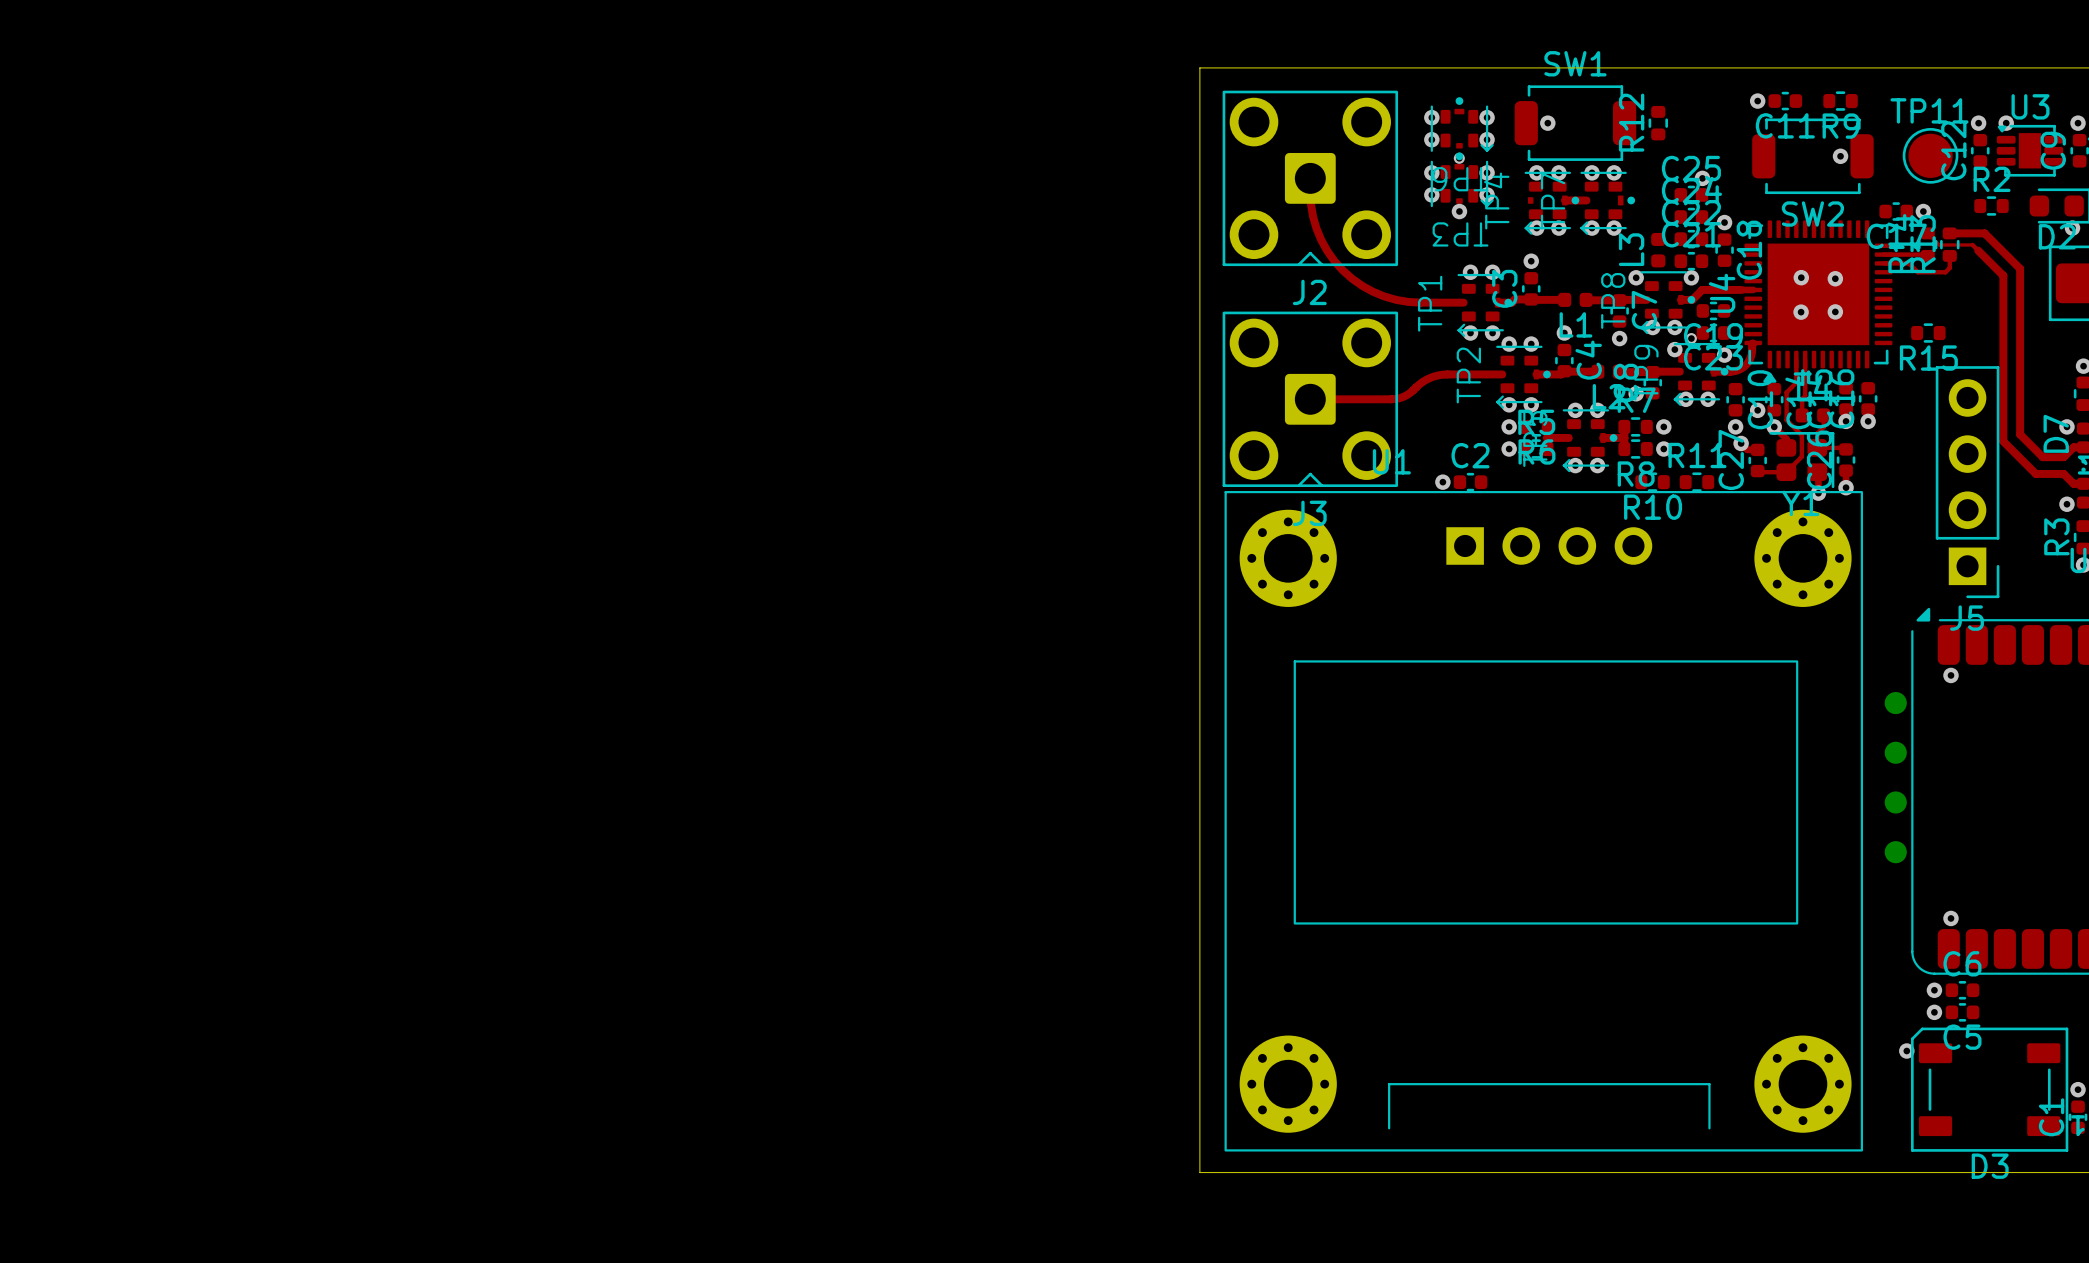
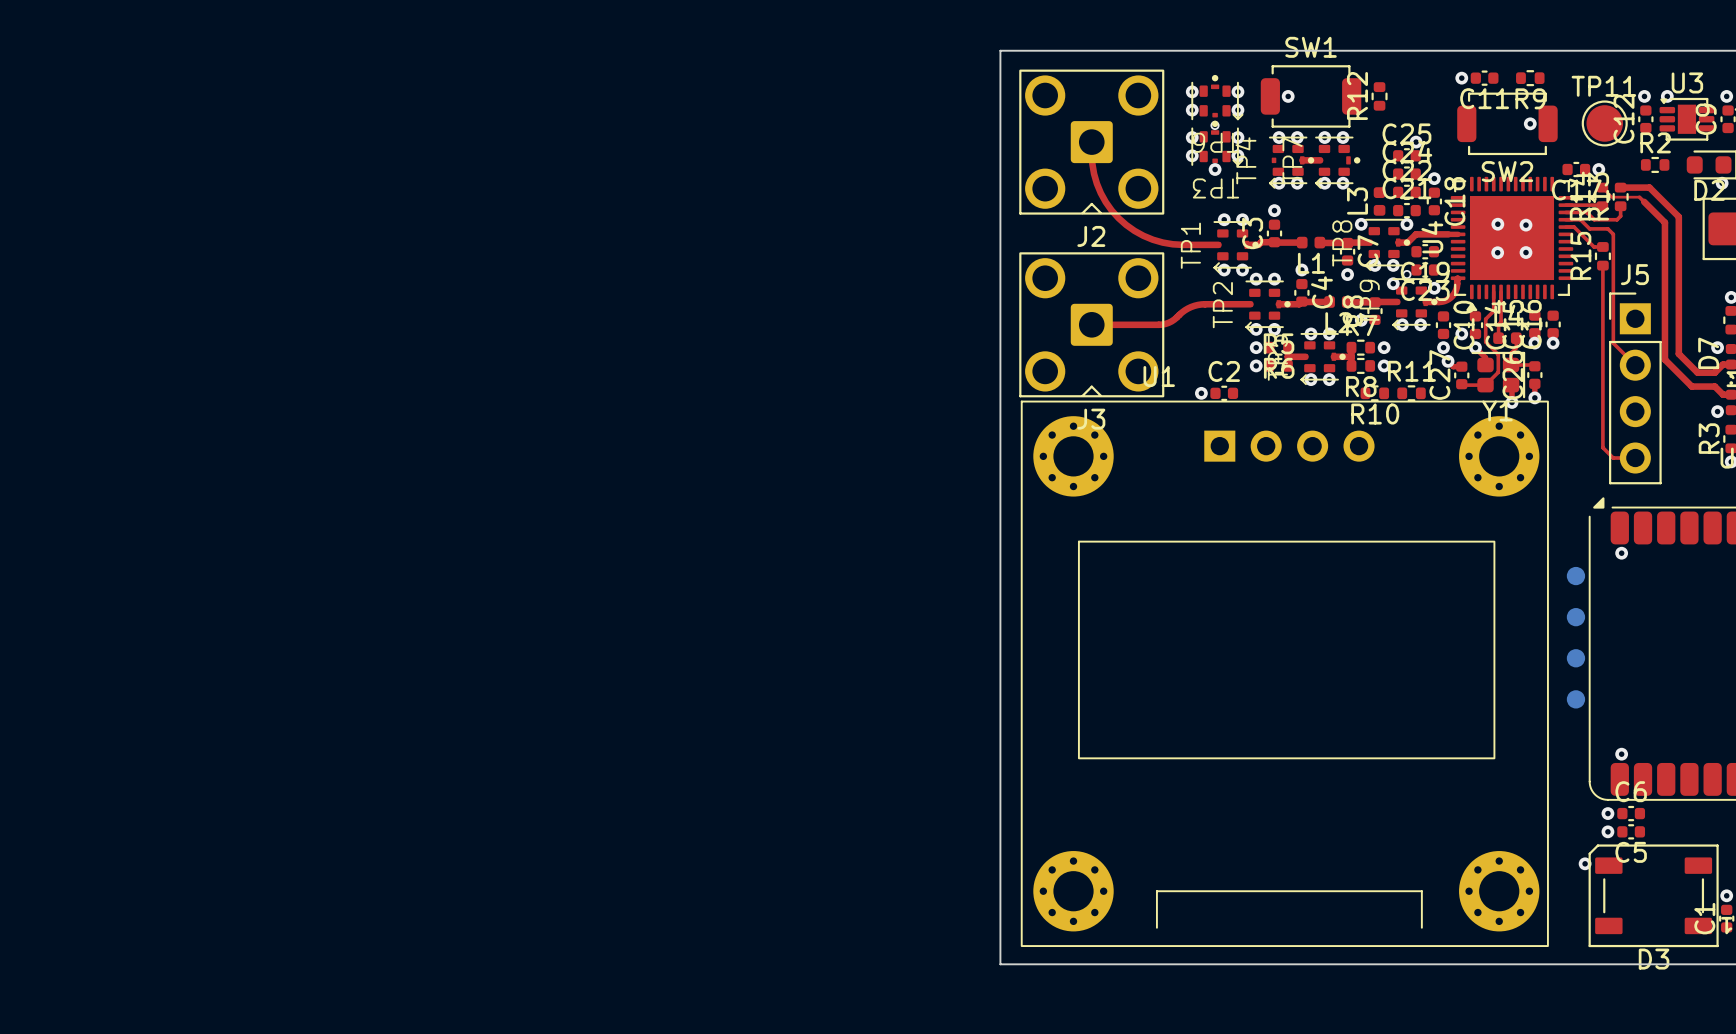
top track: none -> (1565, 219) (1580, 219) (1589, 228) (1607, 228) (1613, 234) (1613, 343) (1635, 365)
top track: none -> (1565, 227) (1574, 227) (1594, 246) (1602, 246)
top track: none -> (1602, 265) (1602, 447) (1613, 458) (1635, 458)
R15 rotation: 0° (1928, 333) -> 90° clockwise (1602, 256)
J5 rotation: 0° (1967, 482) -> 180° (1635, 388)

